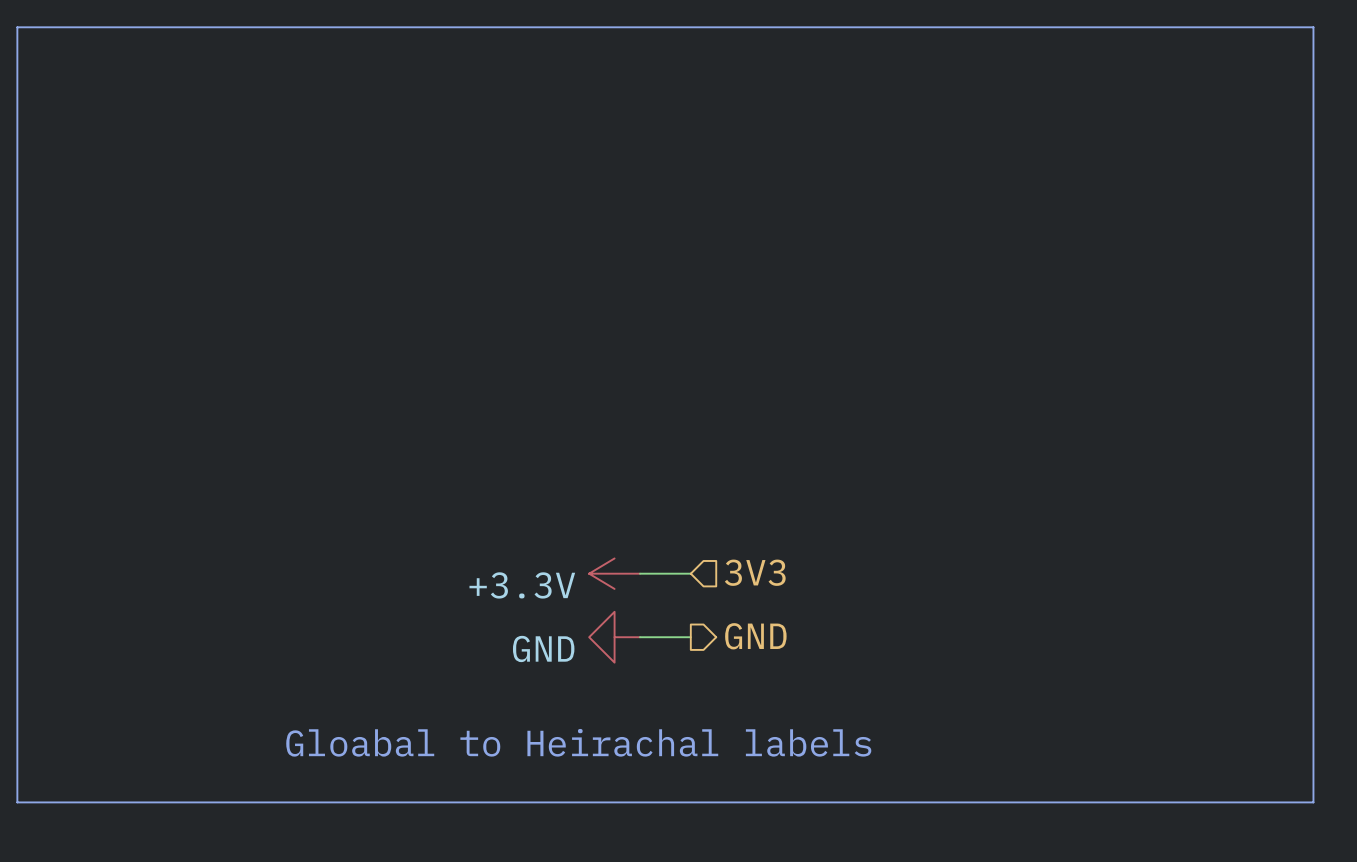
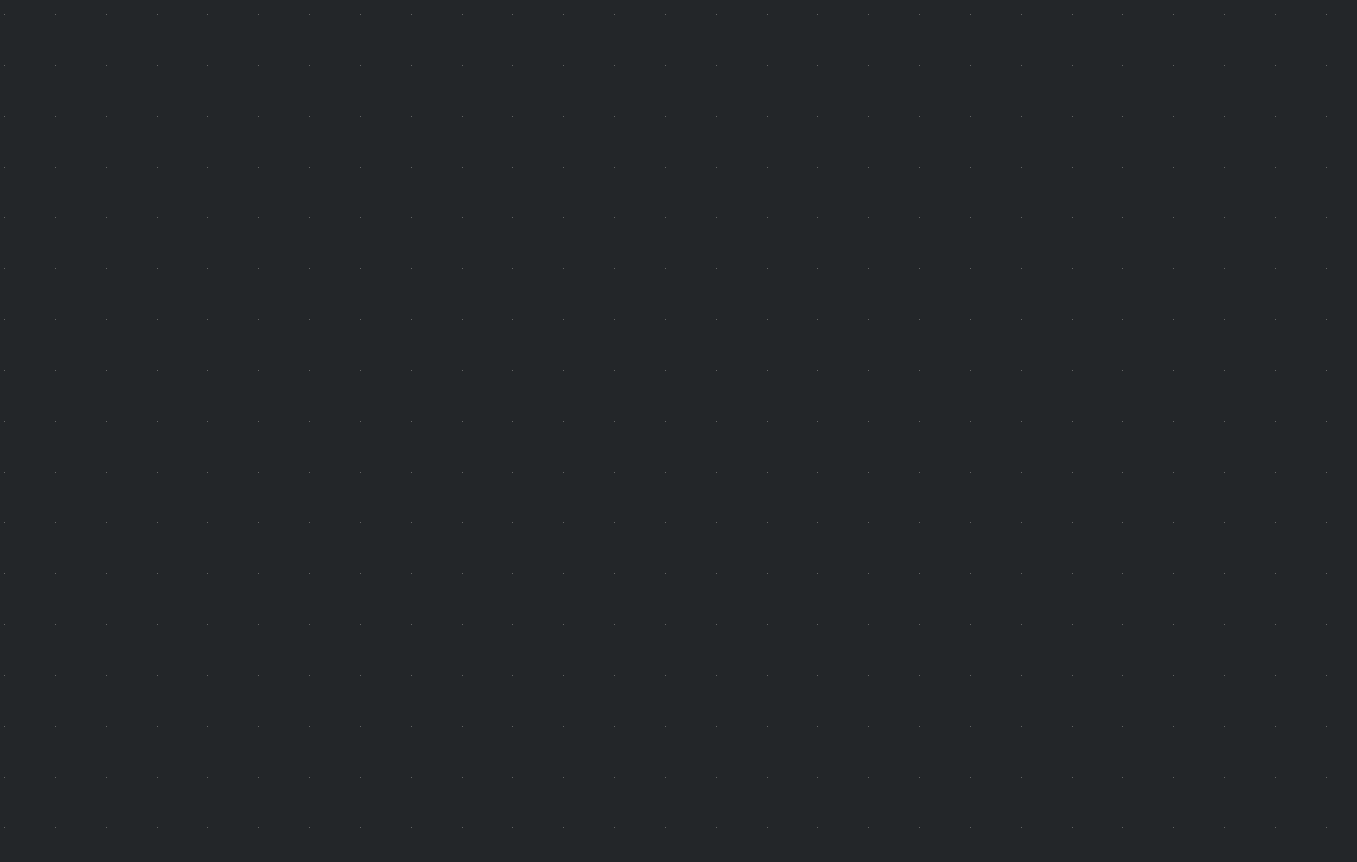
line: (17, 27) (1313, 27) (1313, 802) (17, 802) (17, 27) -> none
hierarchical label: 3V3 (755, 572) -> none
power symbol: +3.3V (614, 573) -> none
wire: (639, 573) (690, 573) -> none
hierarchical label: GND (755, 636) -> none
power symbol: GND (614, 637) -> none
wire: (639, 637) (690, 637) -> none
text: Gloabal to Heirachal labels (578, 742) -> none

